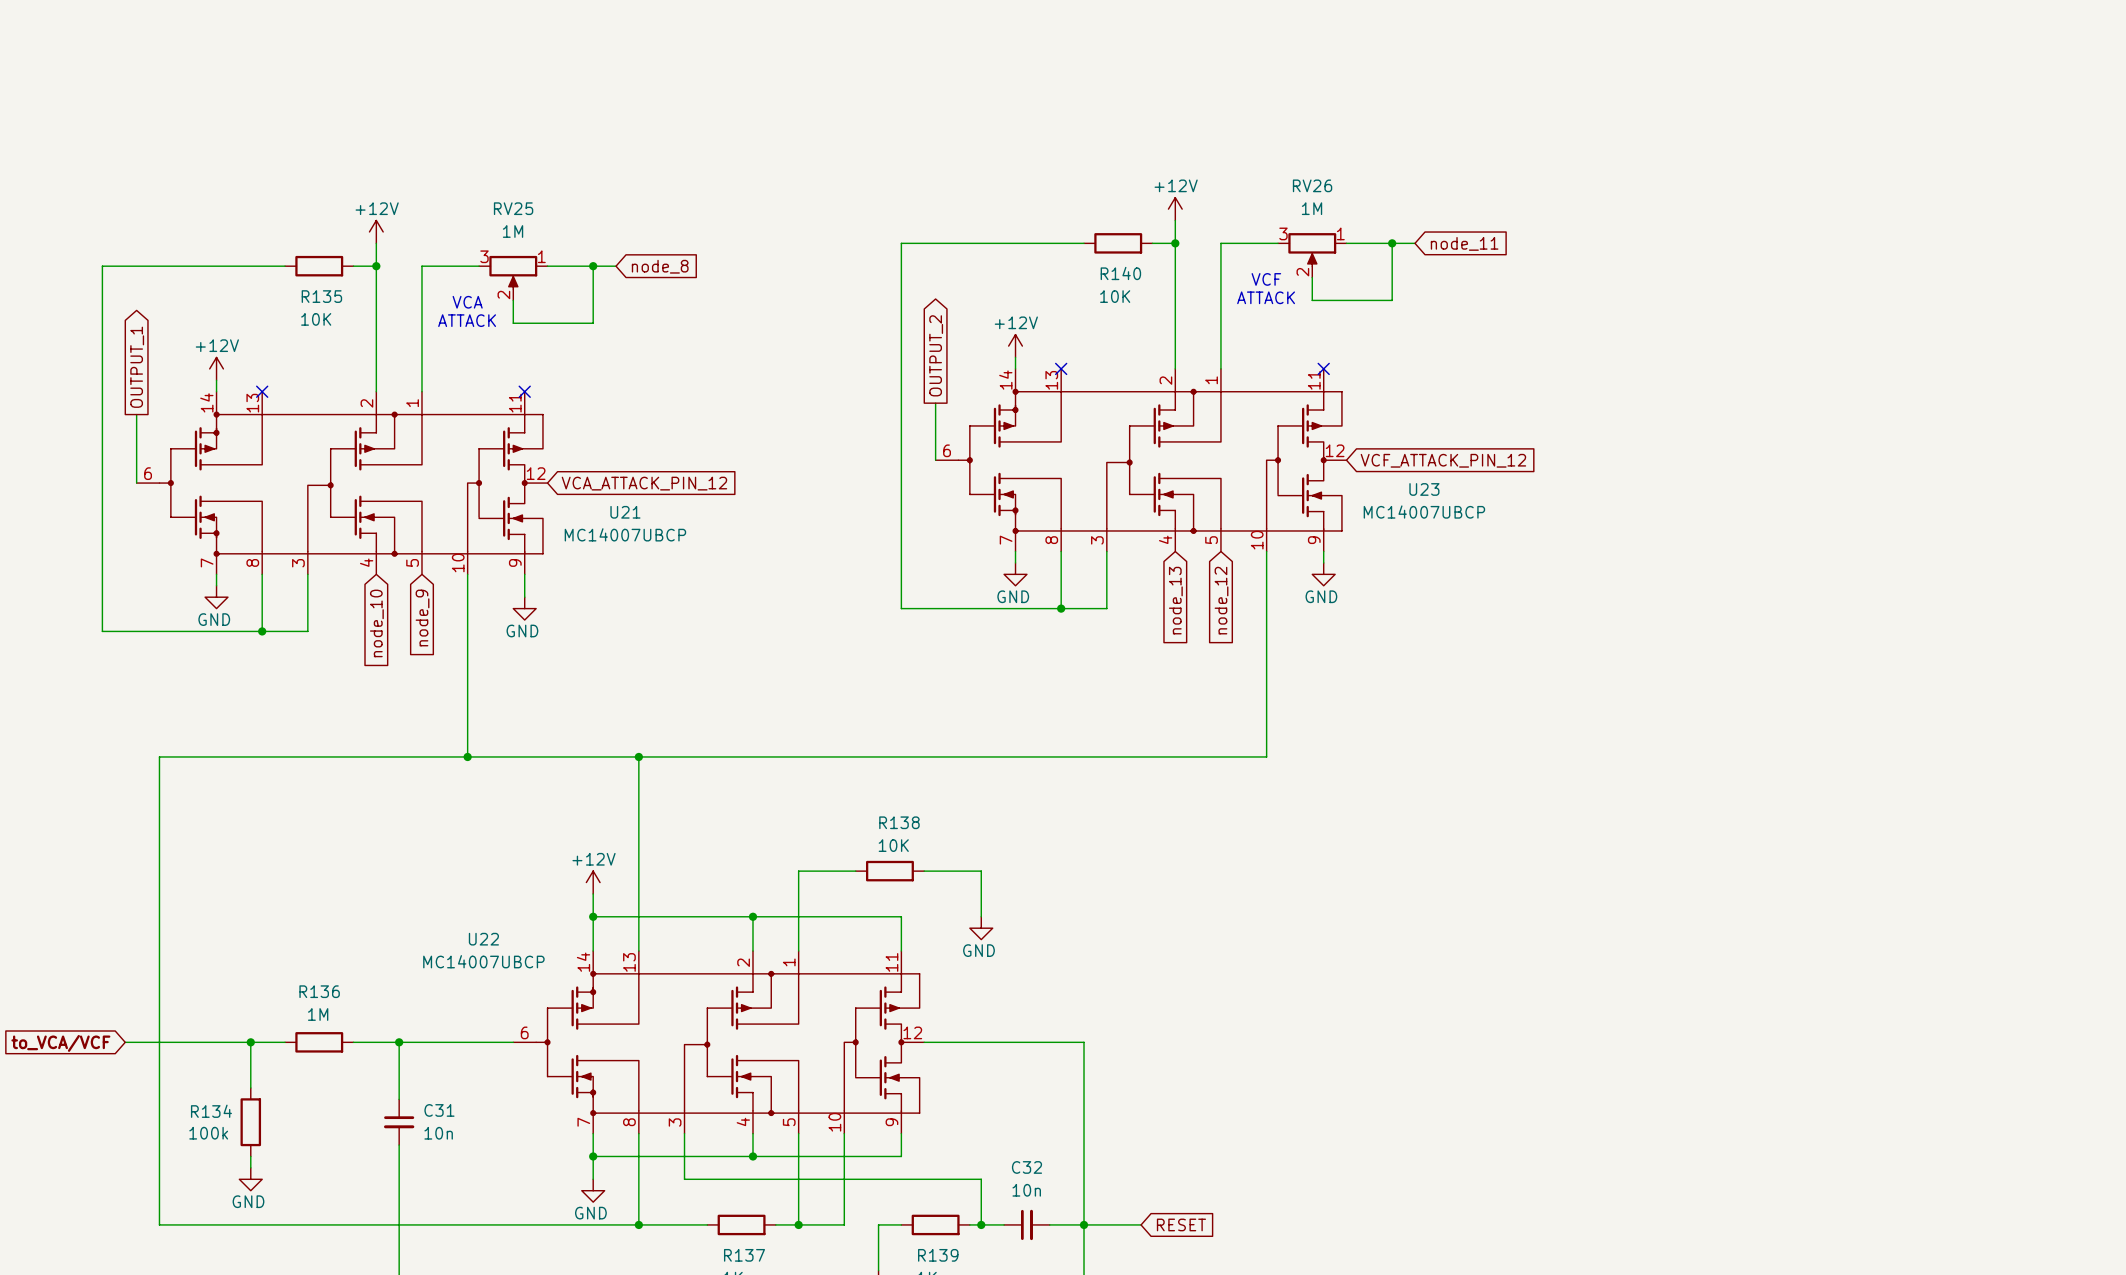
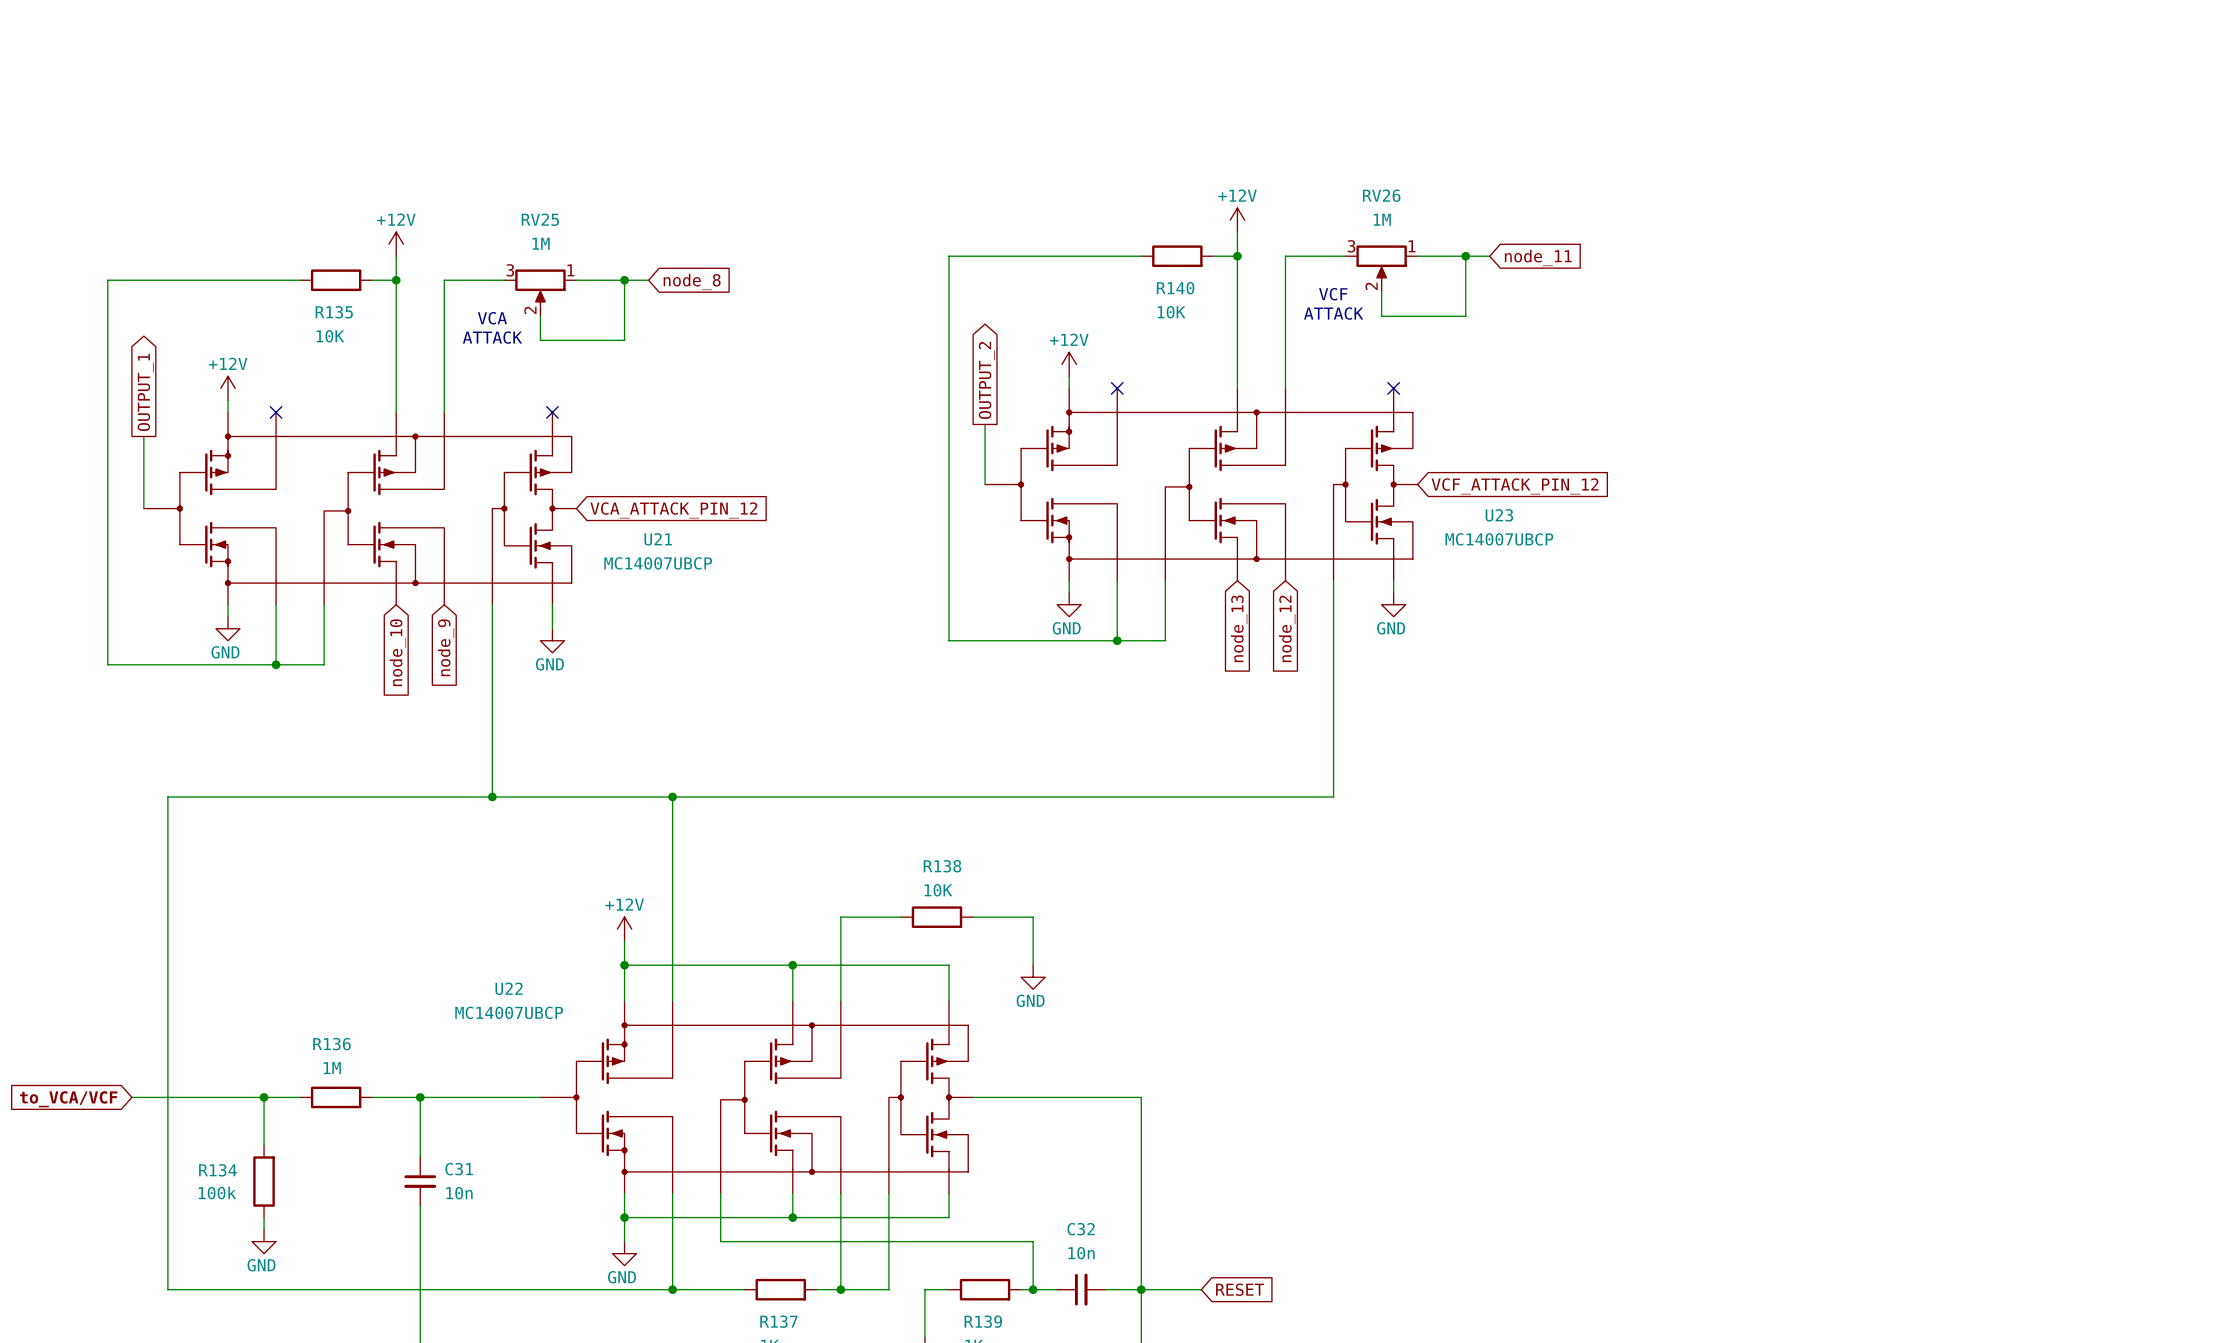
U23 symbol: [935, 368, 1347, 552] -> [985, 388, 1418, 581]
U21 symbol: [136, 391, 548, 575] -> [143, 412, 577, 605]
U22 symbol: [513, 951, 925, 1134] -> [540, 1001, 974, 1194]

